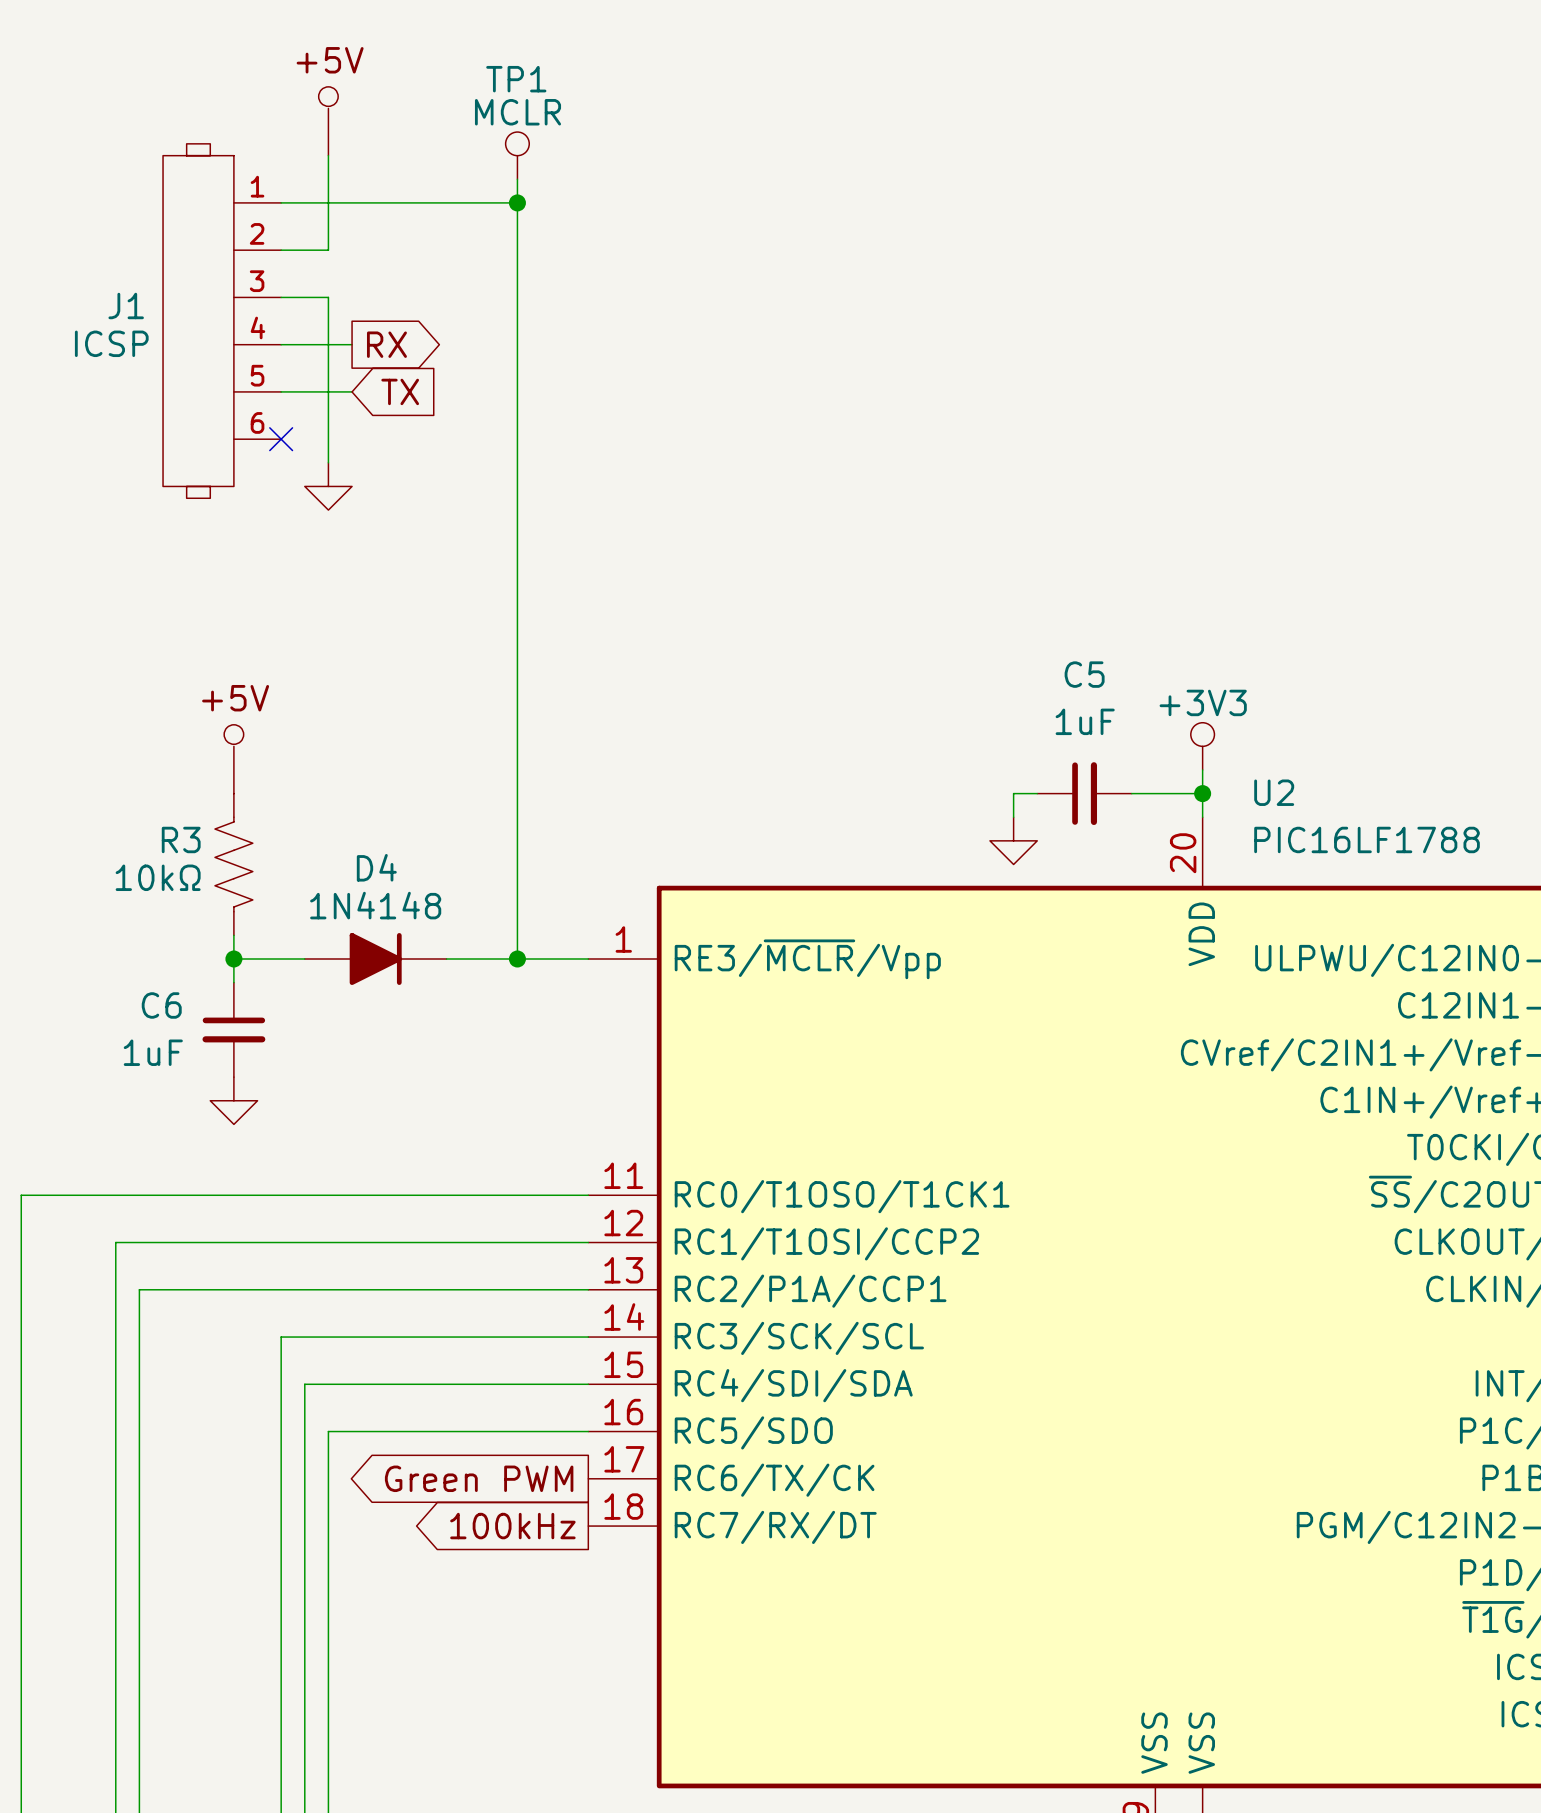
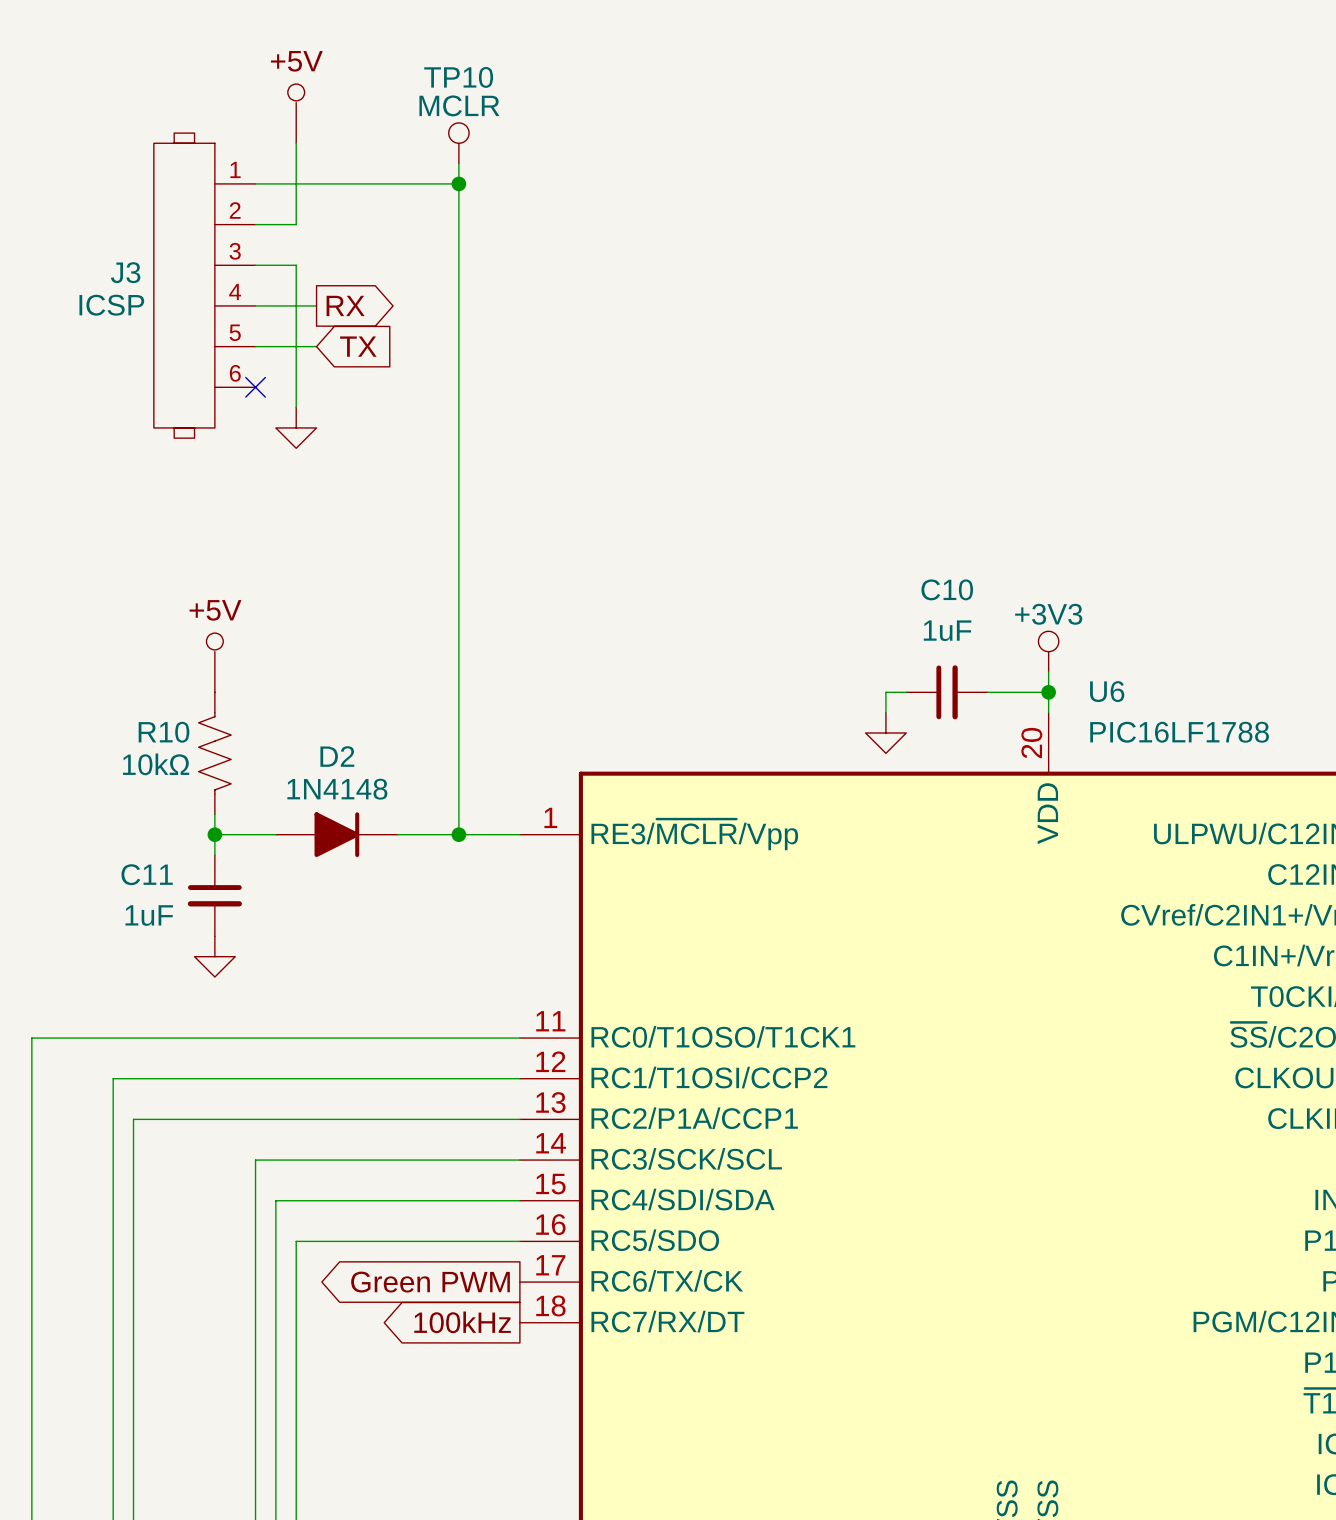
TP1 name: TP1 (516, 79) -> TP10 (458, 77)
J1 name: J1 (126, 306) -> J3 (125, 272)
C5 name: C5 (1084, 674) -> C10 (947, 589)
U2 name: U2 (1274, 792) -> U6 (1107, 691)
R3 name: R3 (181, 839) -> R10 (163, 732)
D4 name: D4 (376, 867) -> D2 (337, 756)
C6 name: C6 (161, 1005) -> C11 (147, 874)

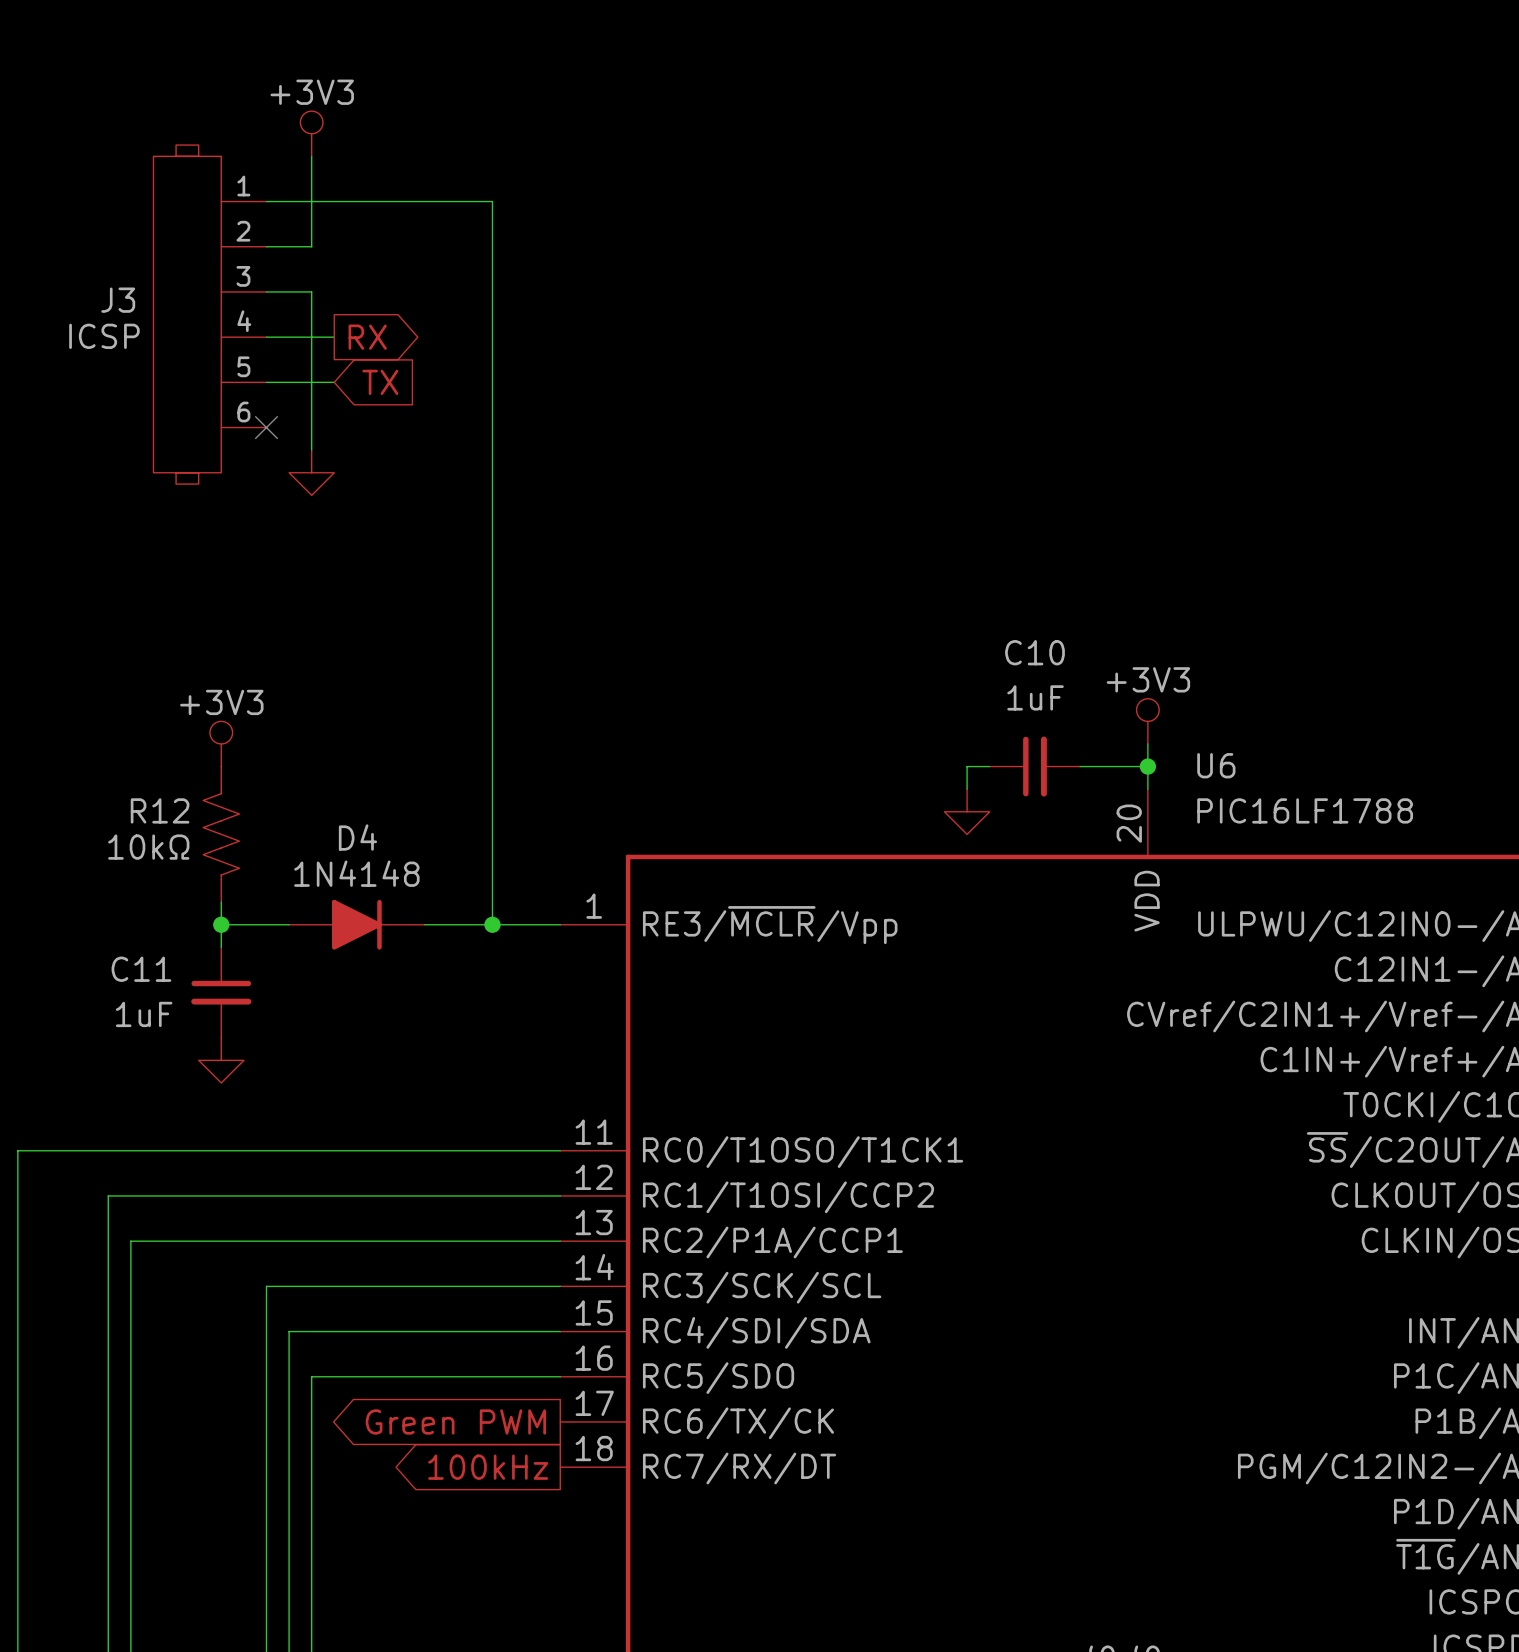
power symbol shape: [287, 84, 305, 144] -> [300, 111, 323, 157]
power symbol text: none -> +3V3 (312, 92)
TP10: MCLR (458, 143) -> none
wire: (458, 163) (458, 183) -> none
junction: (458, 183) -> none
power symbol shape: [206, 633, 224, 693] -> [209, 721, 233, 767]
power symbol text: none -> +3V3 (221, 702)
R10 name: R10 (163, 732) -> R12 (160, 810)
D2 name: D2 (337, 756) -> D4 (357, 837)

